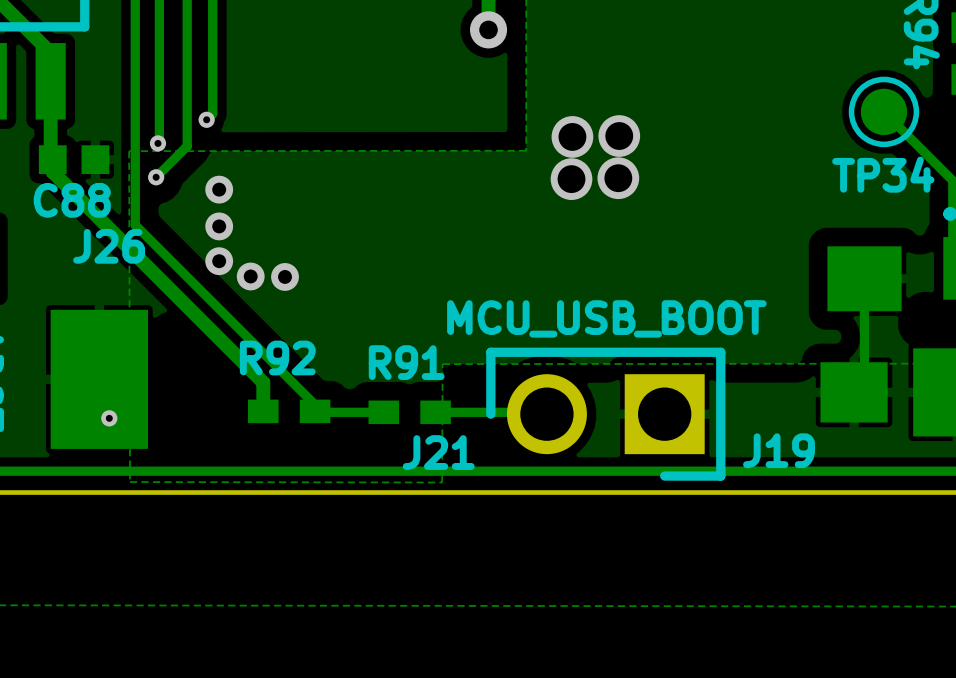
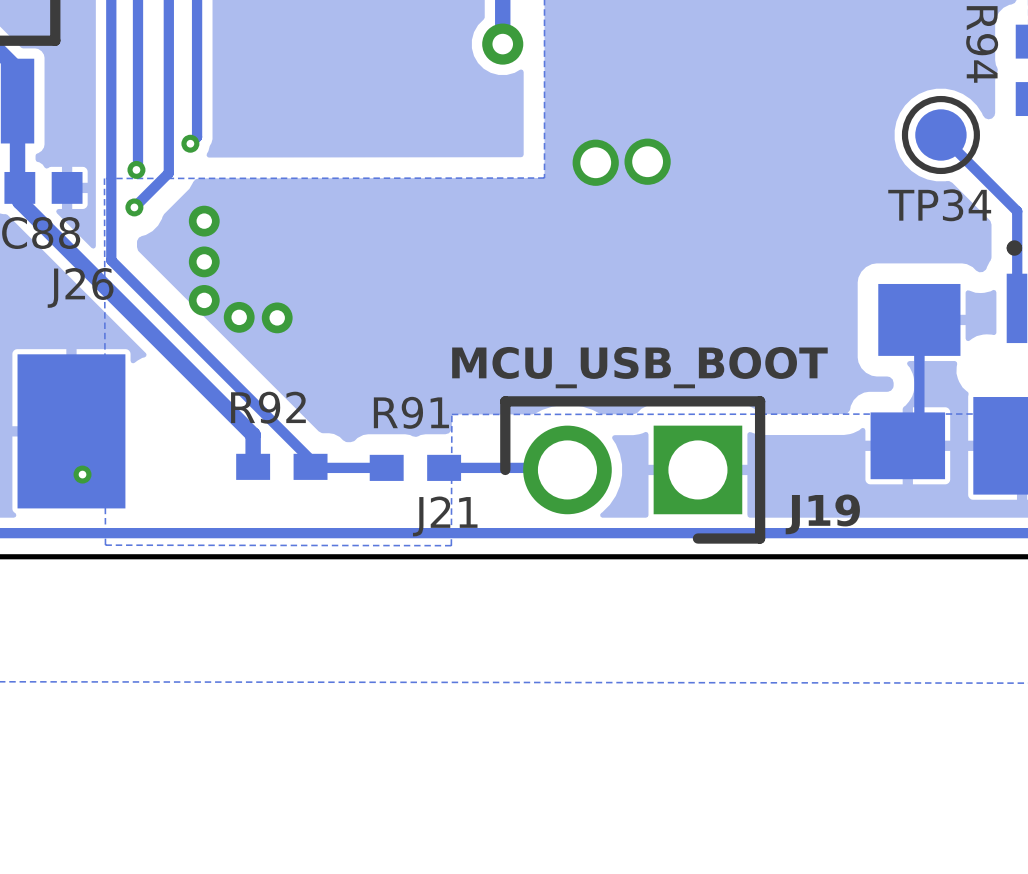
via: (618, 178) -> none
via: (571, 179) -> none

